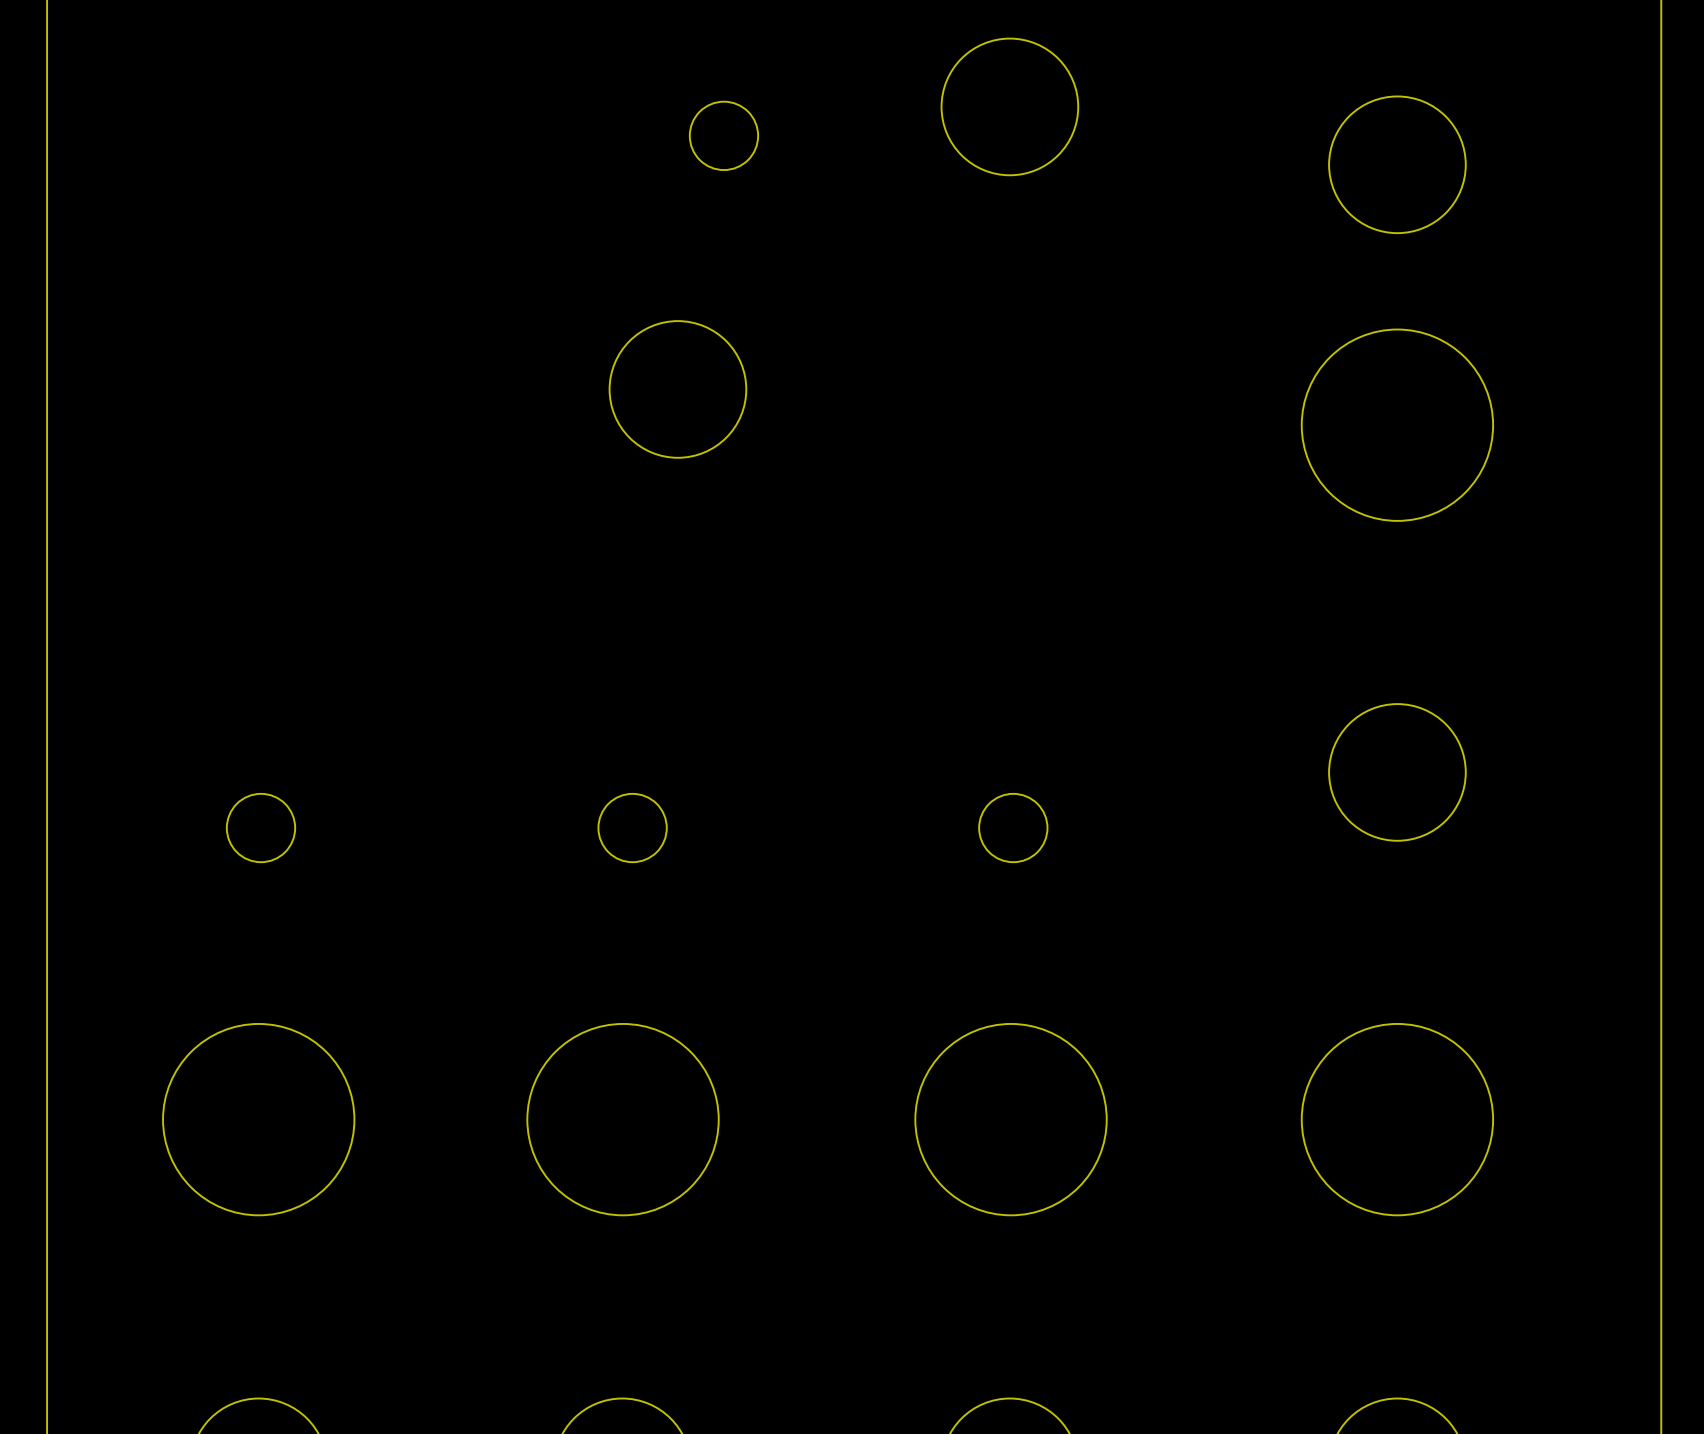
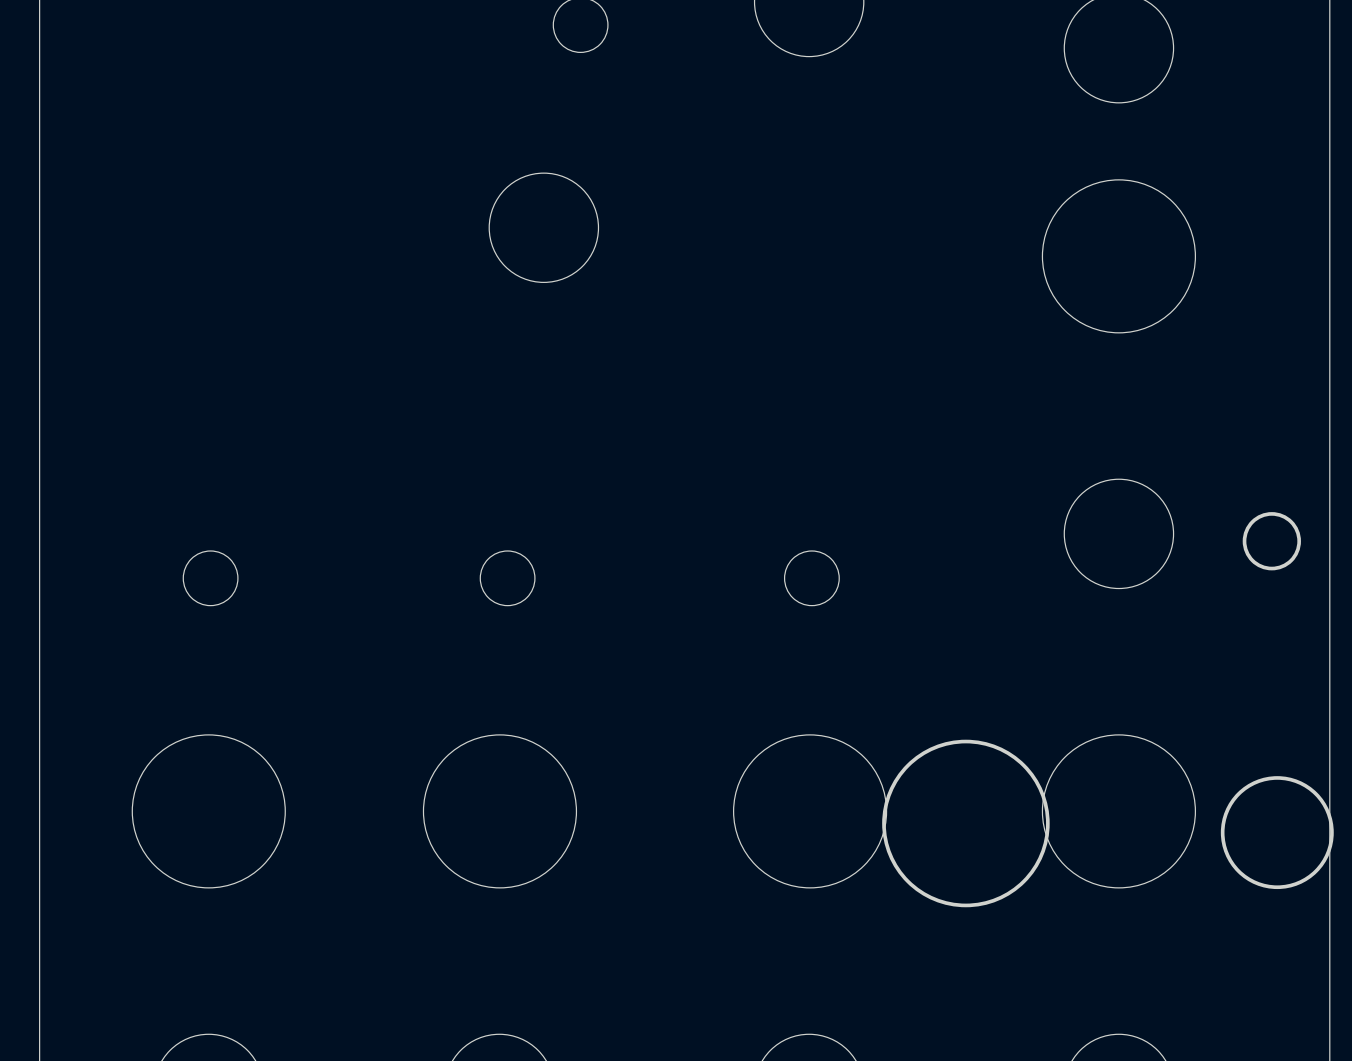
round board edge: none -> [1242, 512, 1301, 571]
round board edge: none -> [882, 739, 1050, 908]
round board edge: none -> [1220, 776, 1334, 890]

